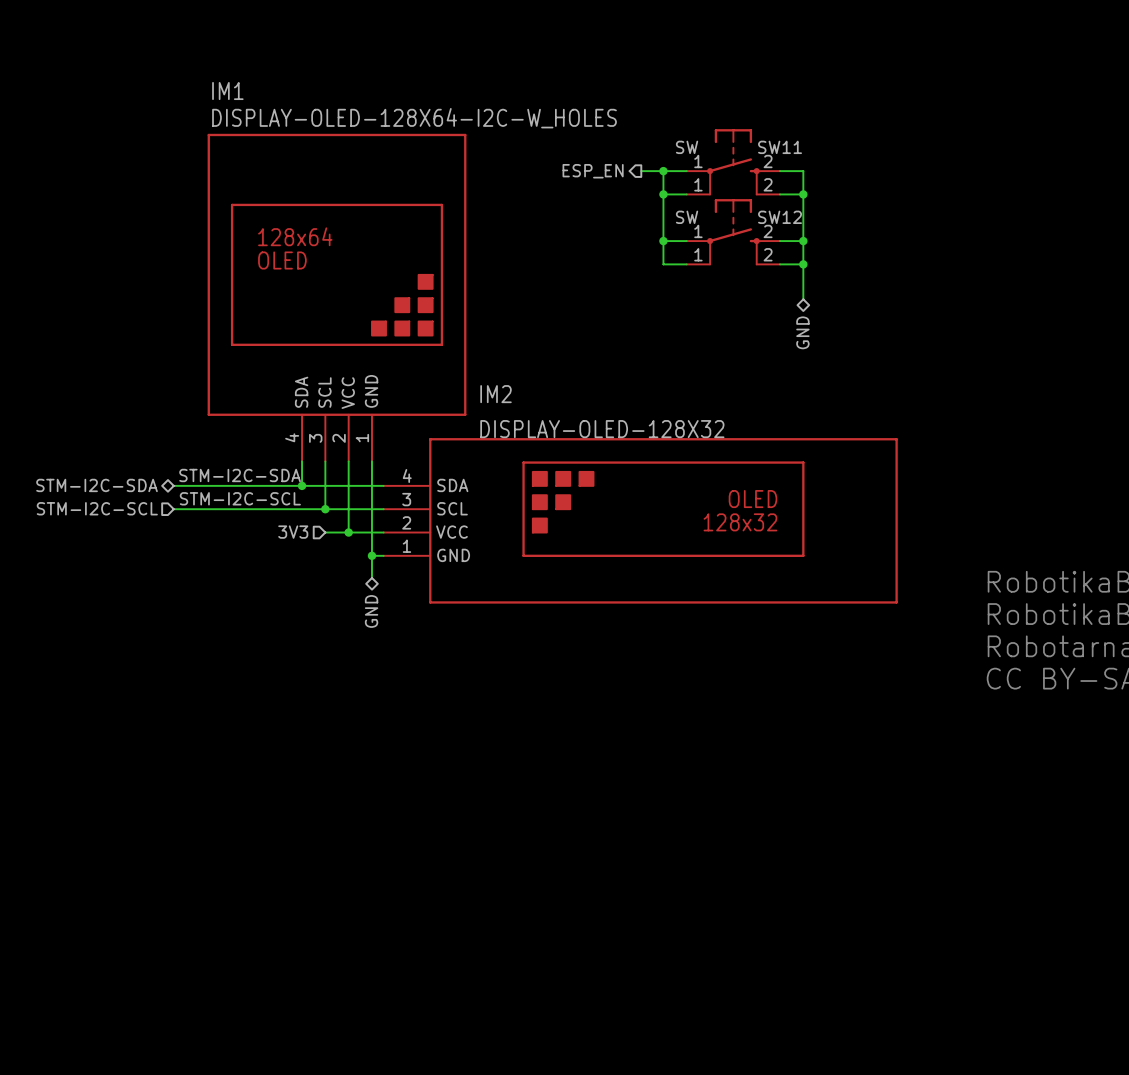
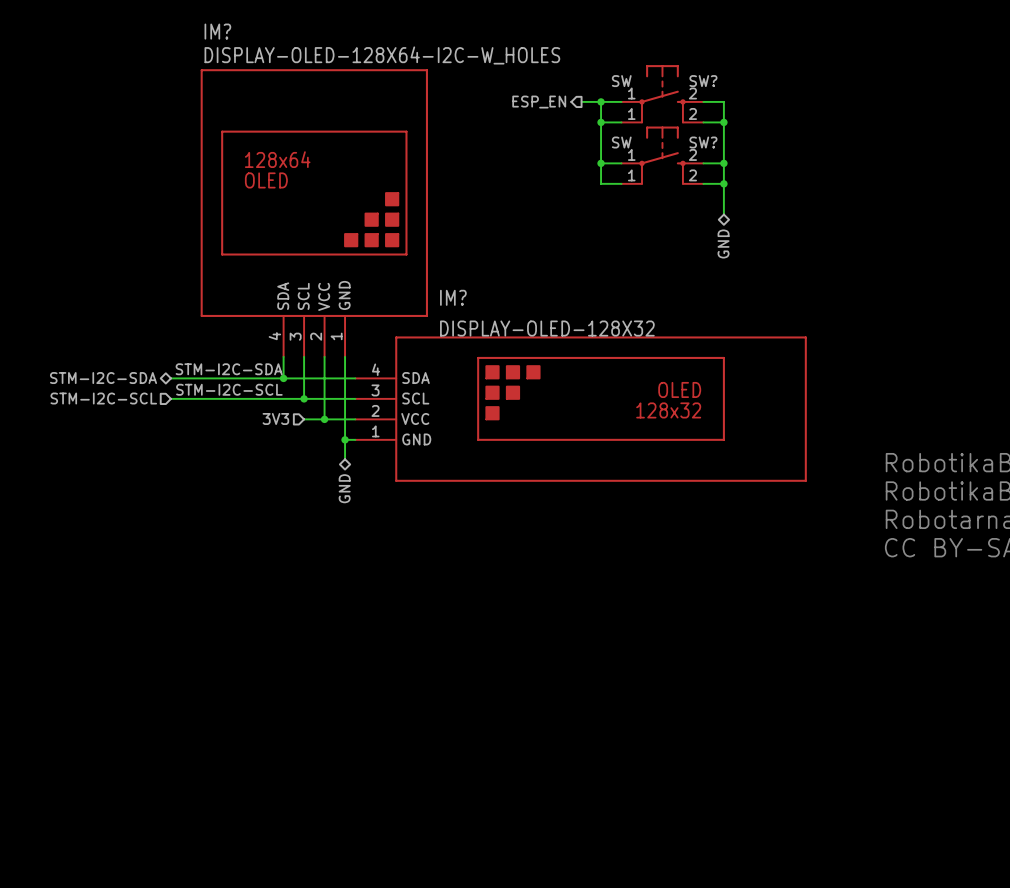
IM1 name: IM1 (227, 91) -> IM? (217, 31)
SW11 name: SW11 (780, 147) -> SW? (703, 81)
SW12 name: SW12 (780, 217) -> SW? (703, 142)
IM2 name: IM2 (496, 394) -> IM? (453, 297)

